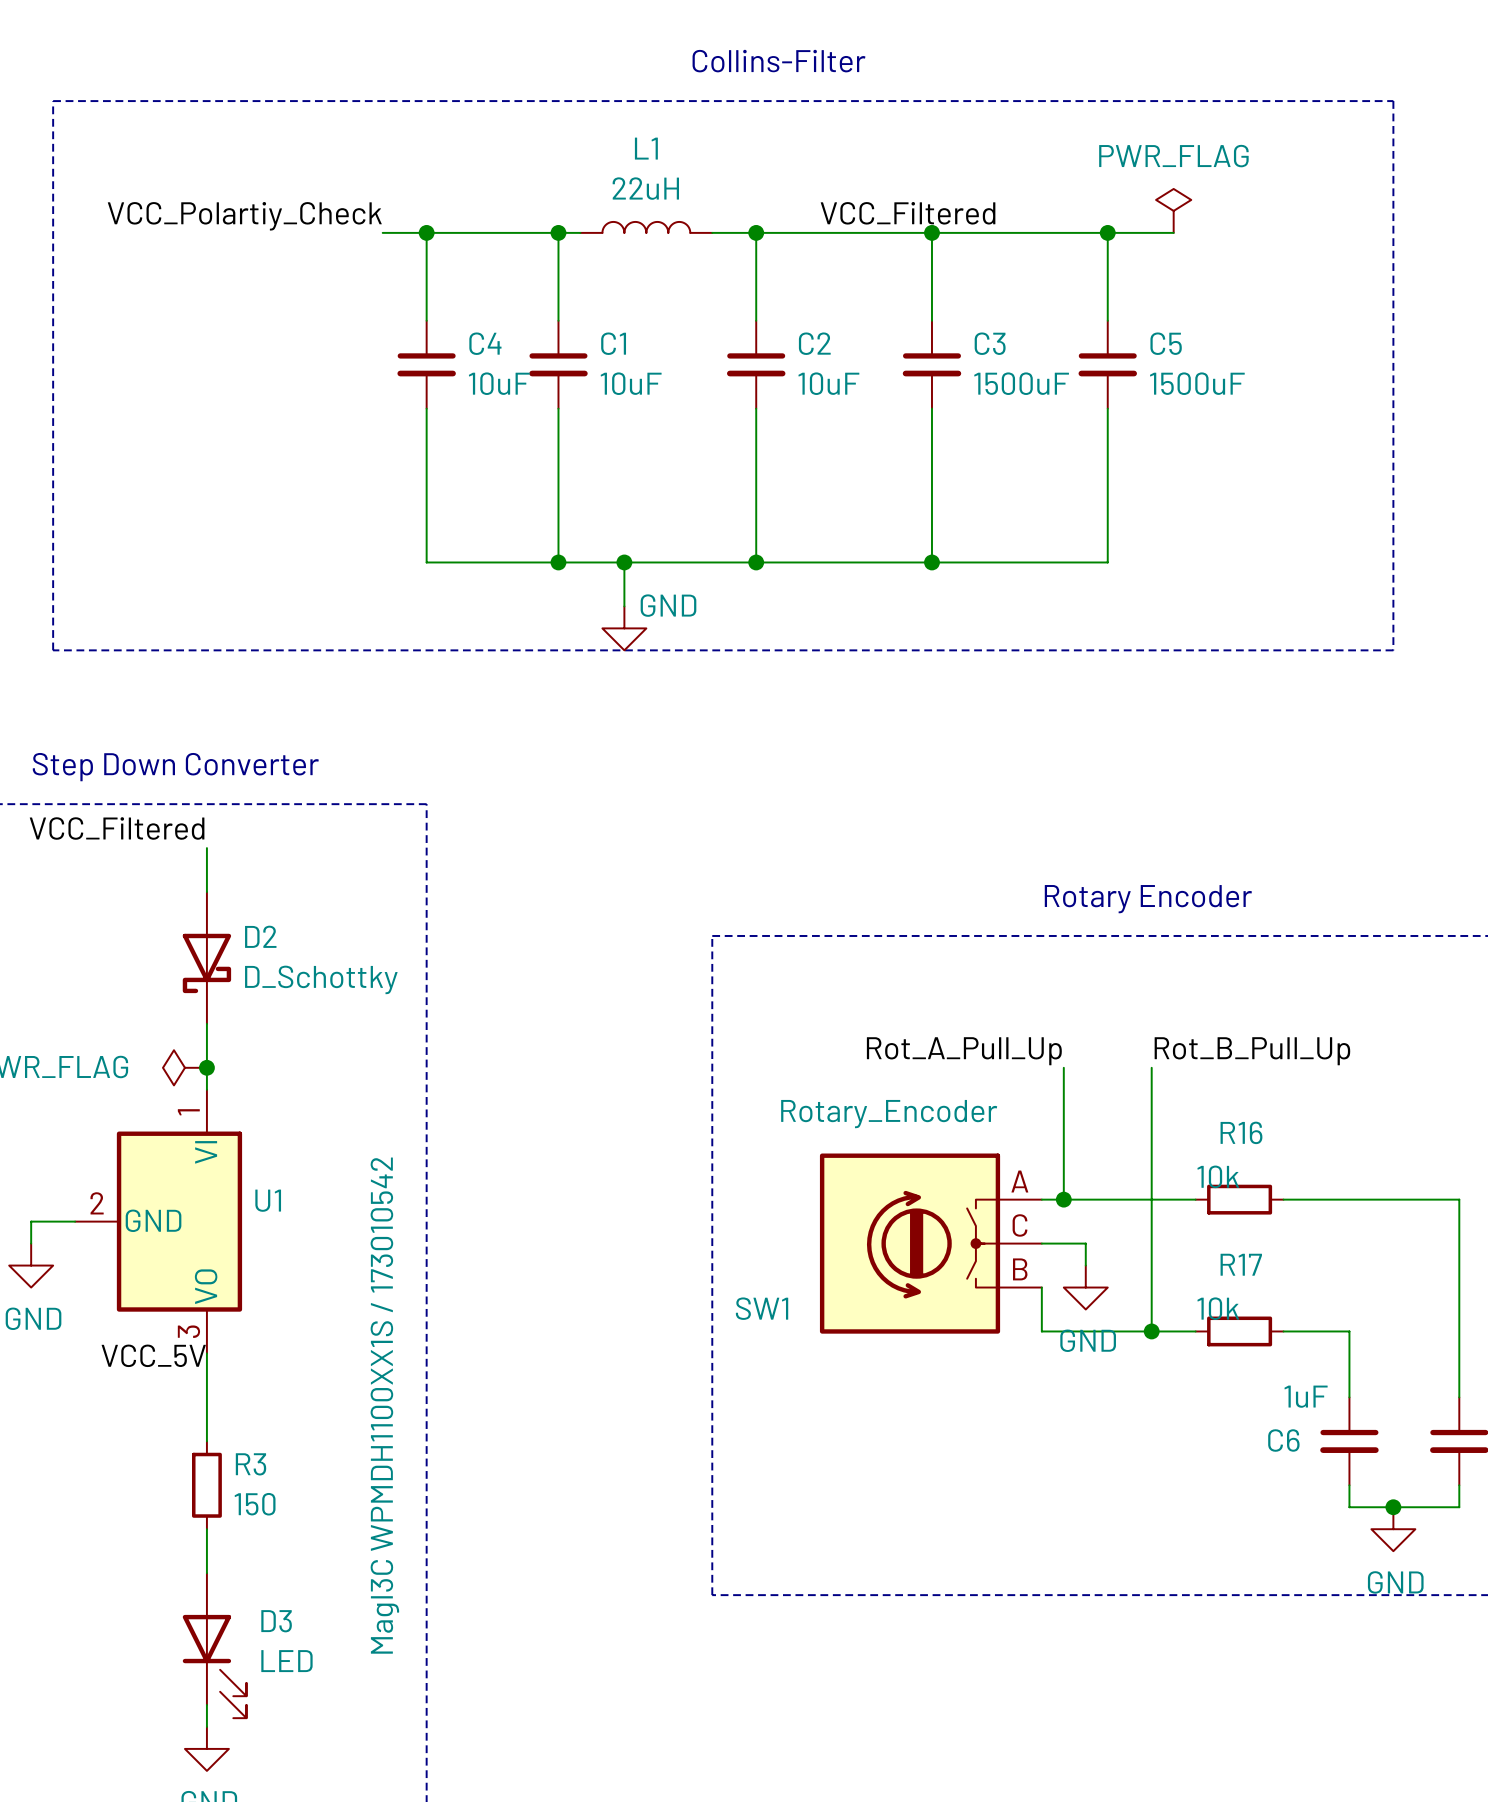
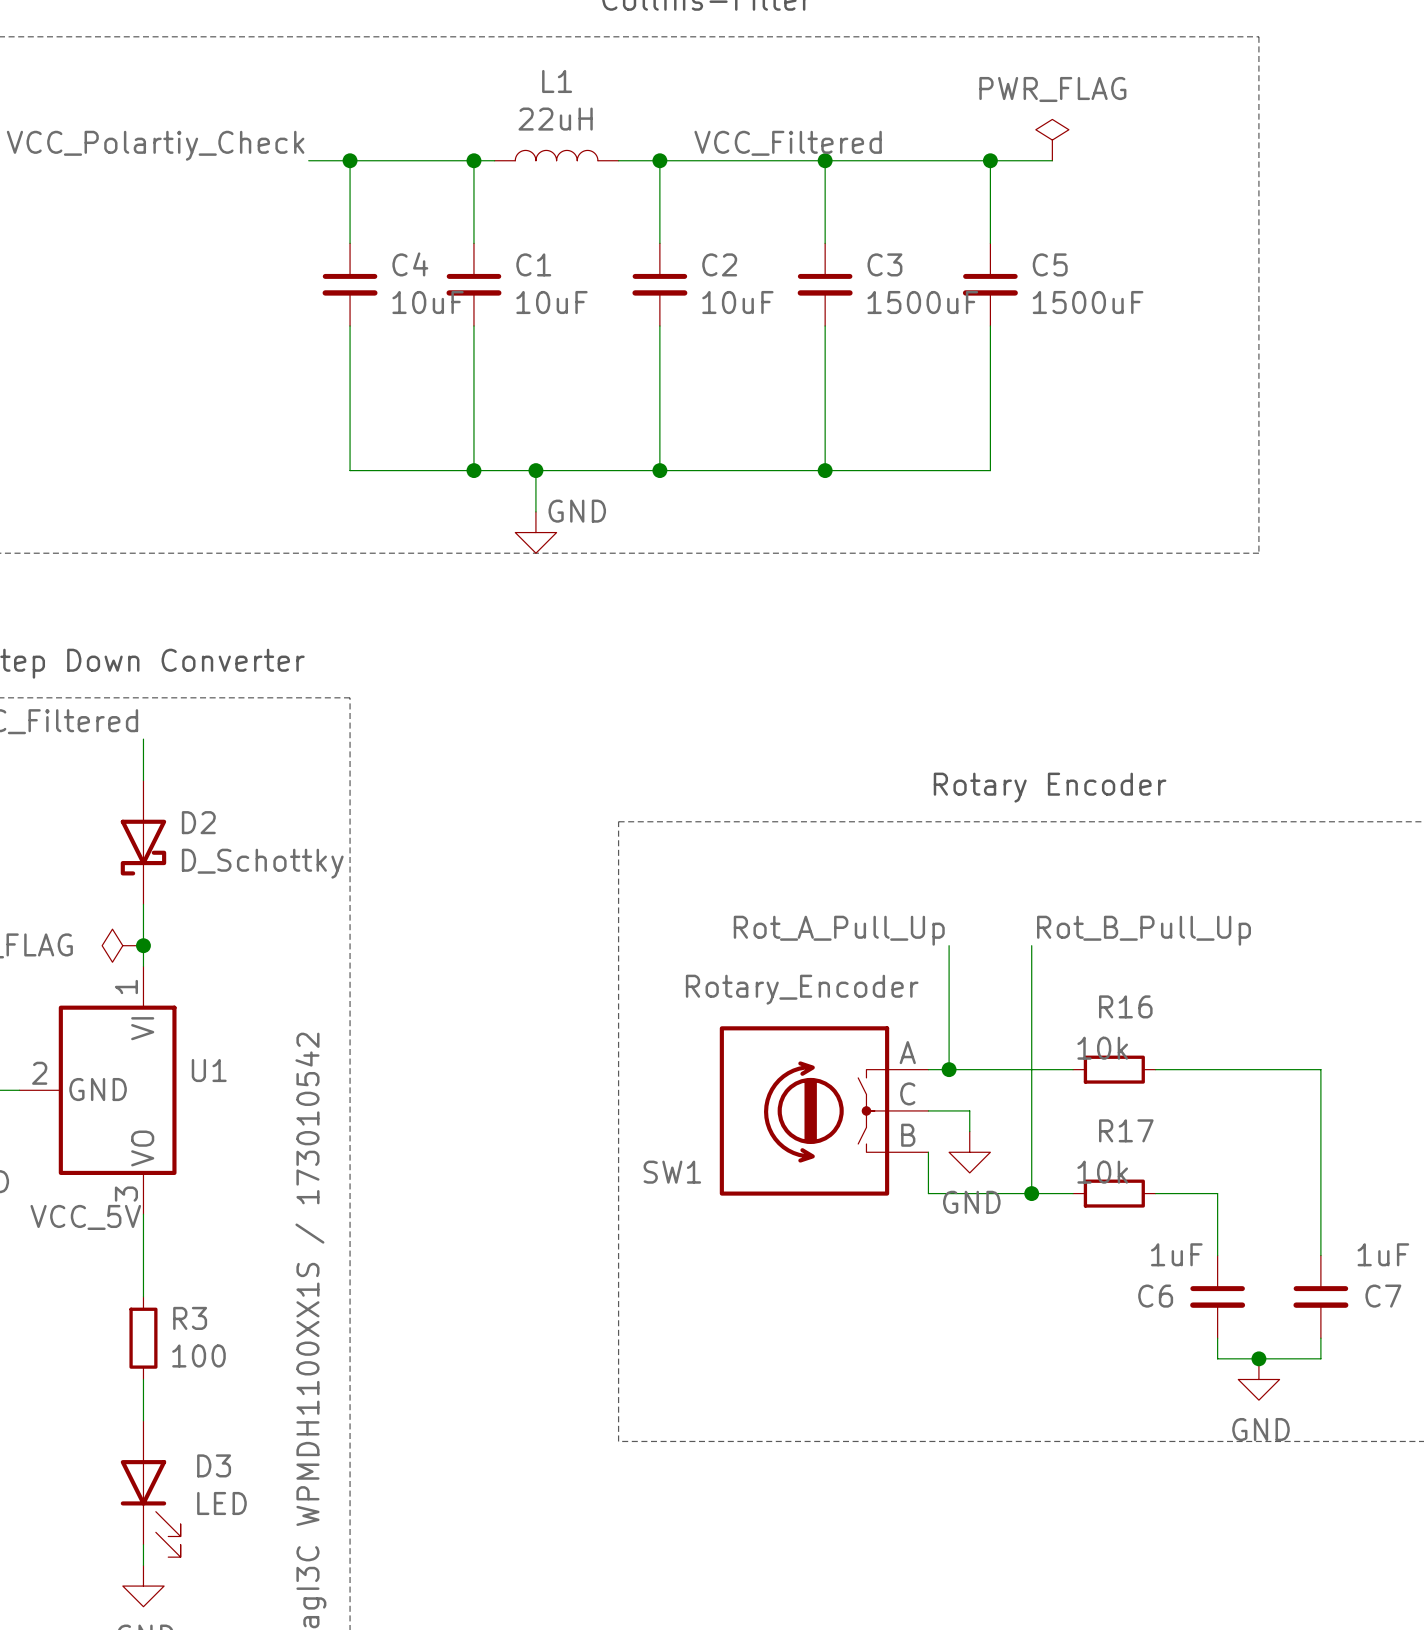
R3 value: 150 (255, 1504) -> 100 (198, 1356)

